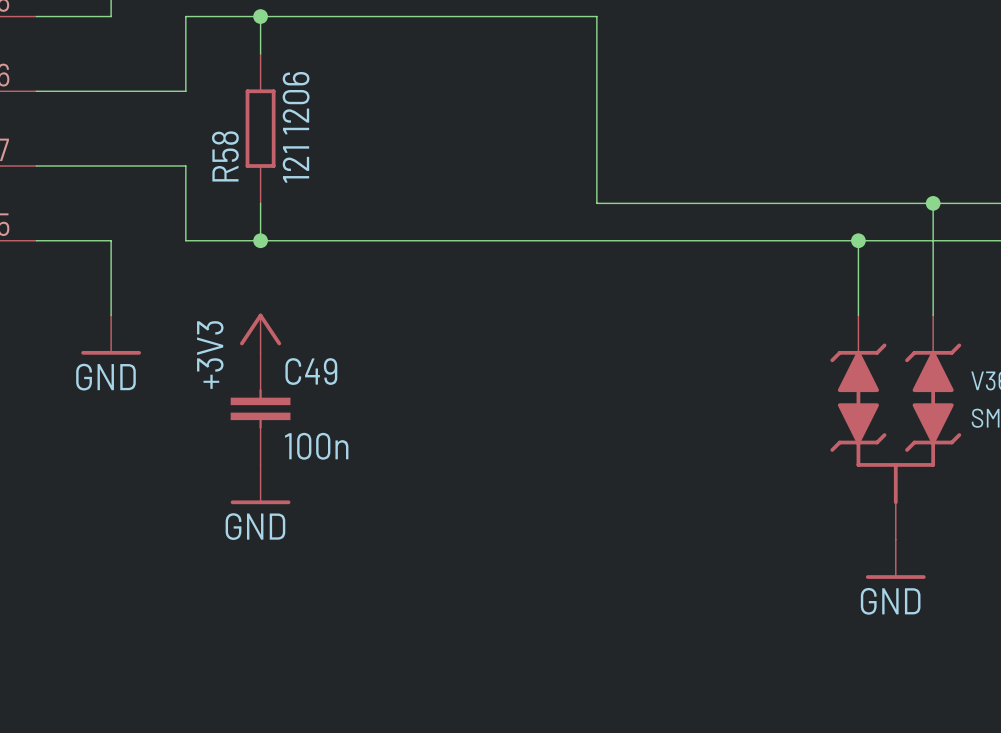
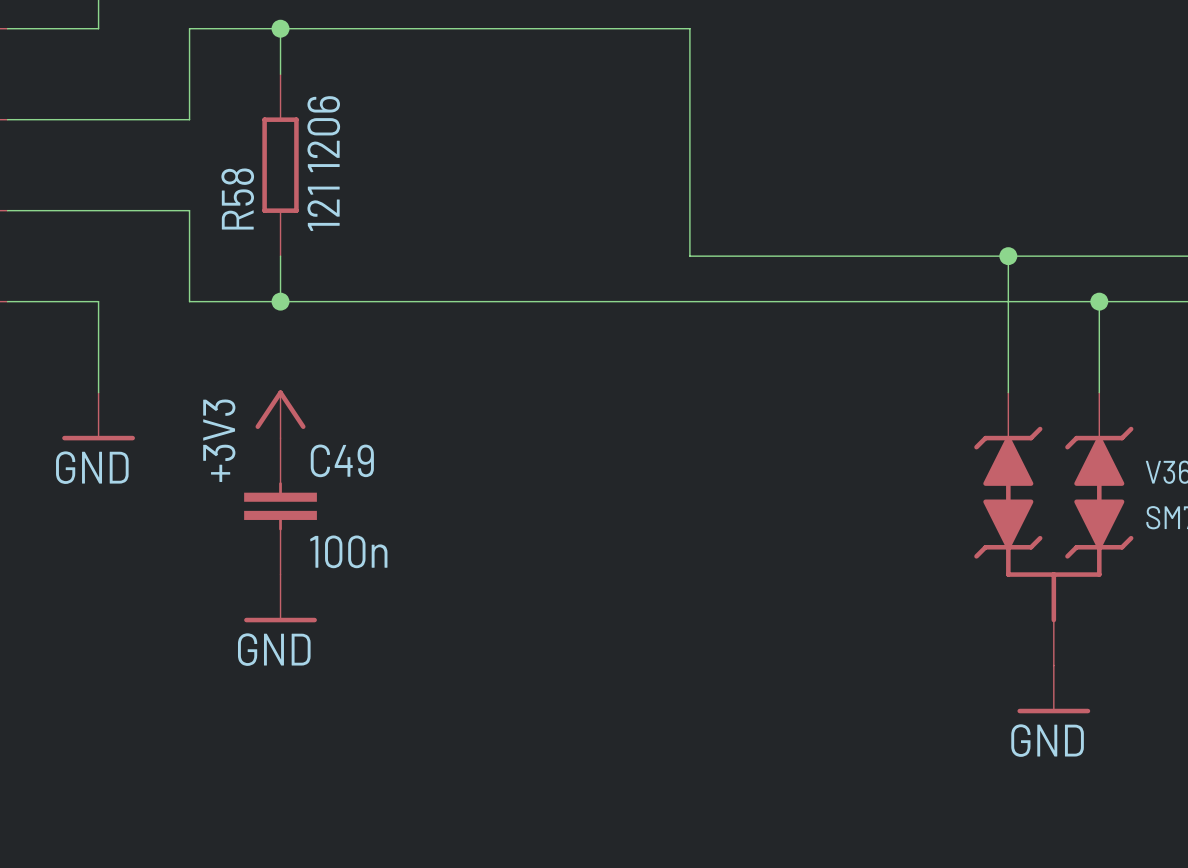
junction: none -> (1008, 256)
wire: (933, 203) (933, 240) -> (1008, 256) (1008, 301)
junction: (933, 203) -> none
junction: (858, 240) -> none
junction: none -> (1099, 301)

